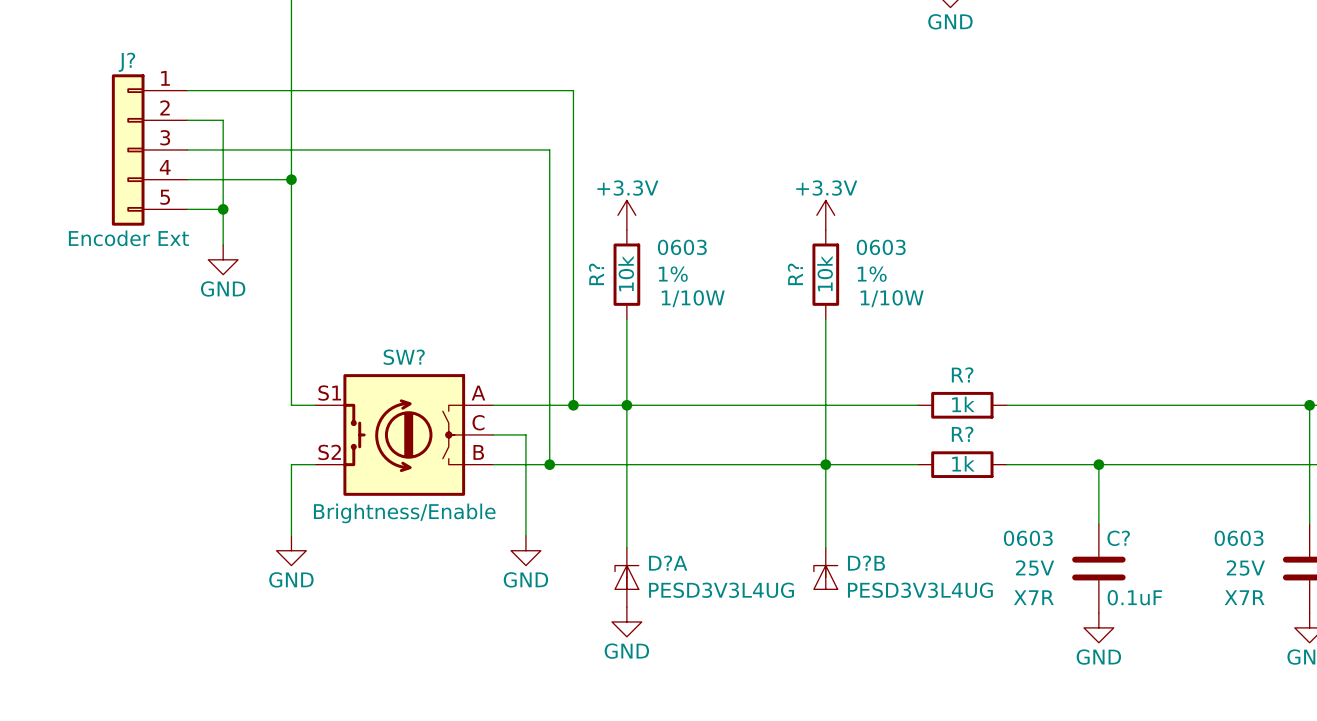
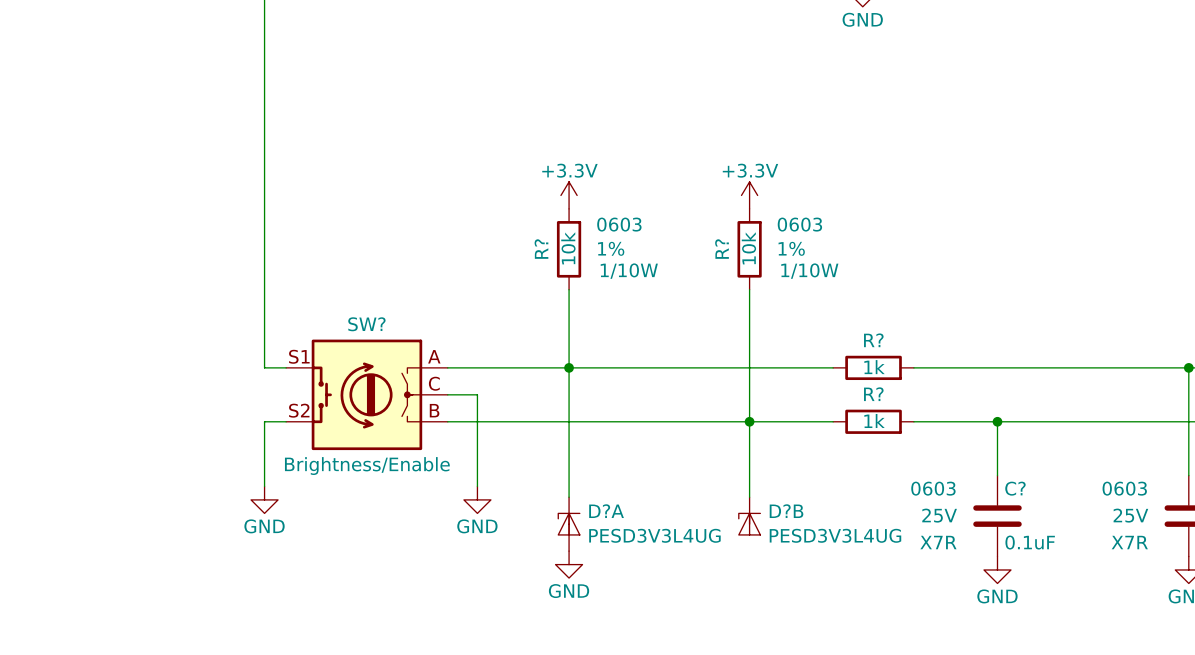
wire: (187, 90) (573, 90) (573, 405) -> none
wire: (187, 120) (223, 120) (223, 244) -> none
J?: Encoder Ext (149, 149) -> none
wire: (187, 149) (549, 149) (549, 464) -> none
wire: (187, 179) (291, 179) -> none
junction: (291, 179) -> none
wire: (187, 209) (223, 209) -> none
junction: (223, 209) -> none
power symbol: GND (223, 259) -> none
junction: (573, 405) -> none
junction: (549, 464) -> none

